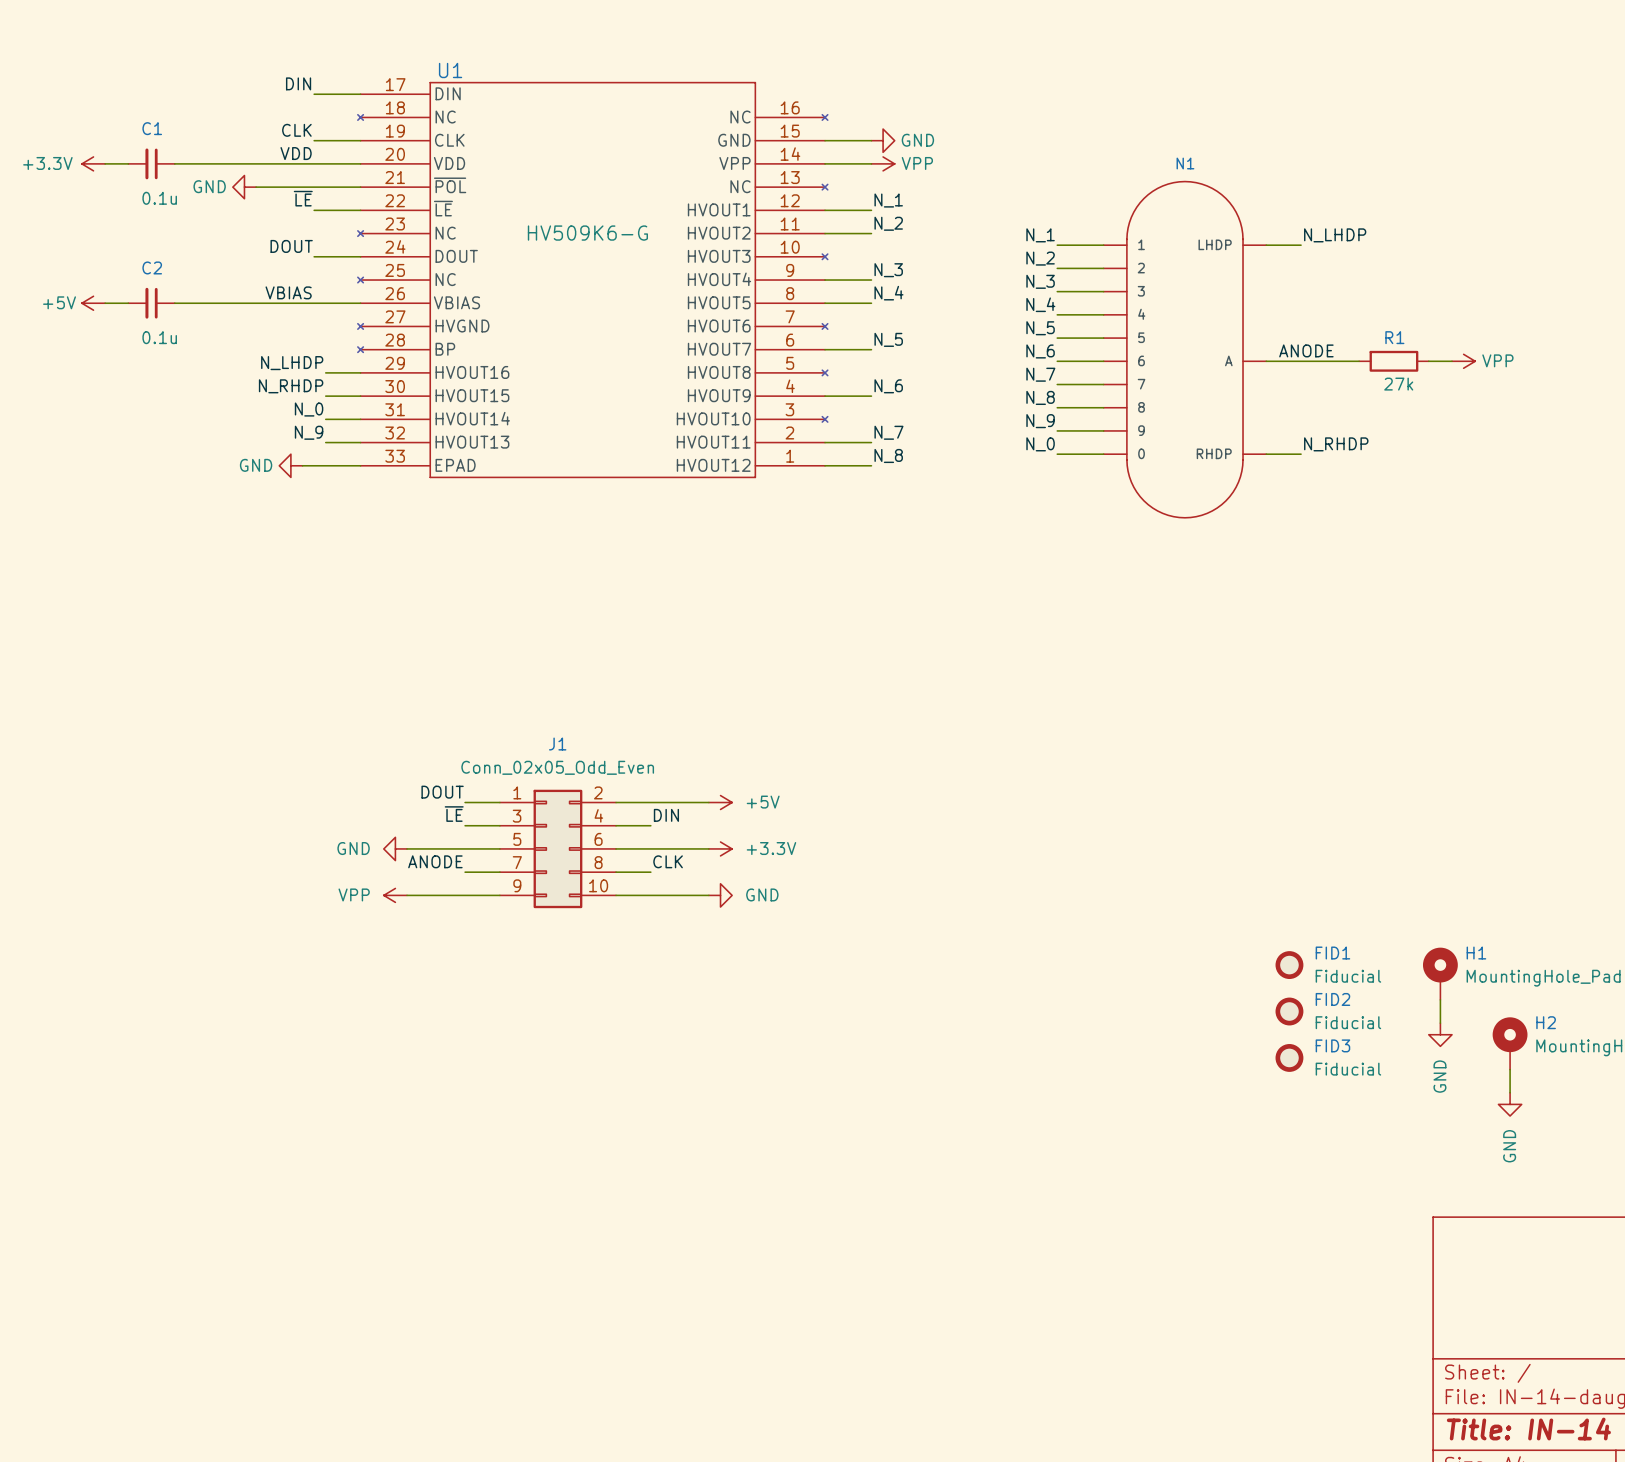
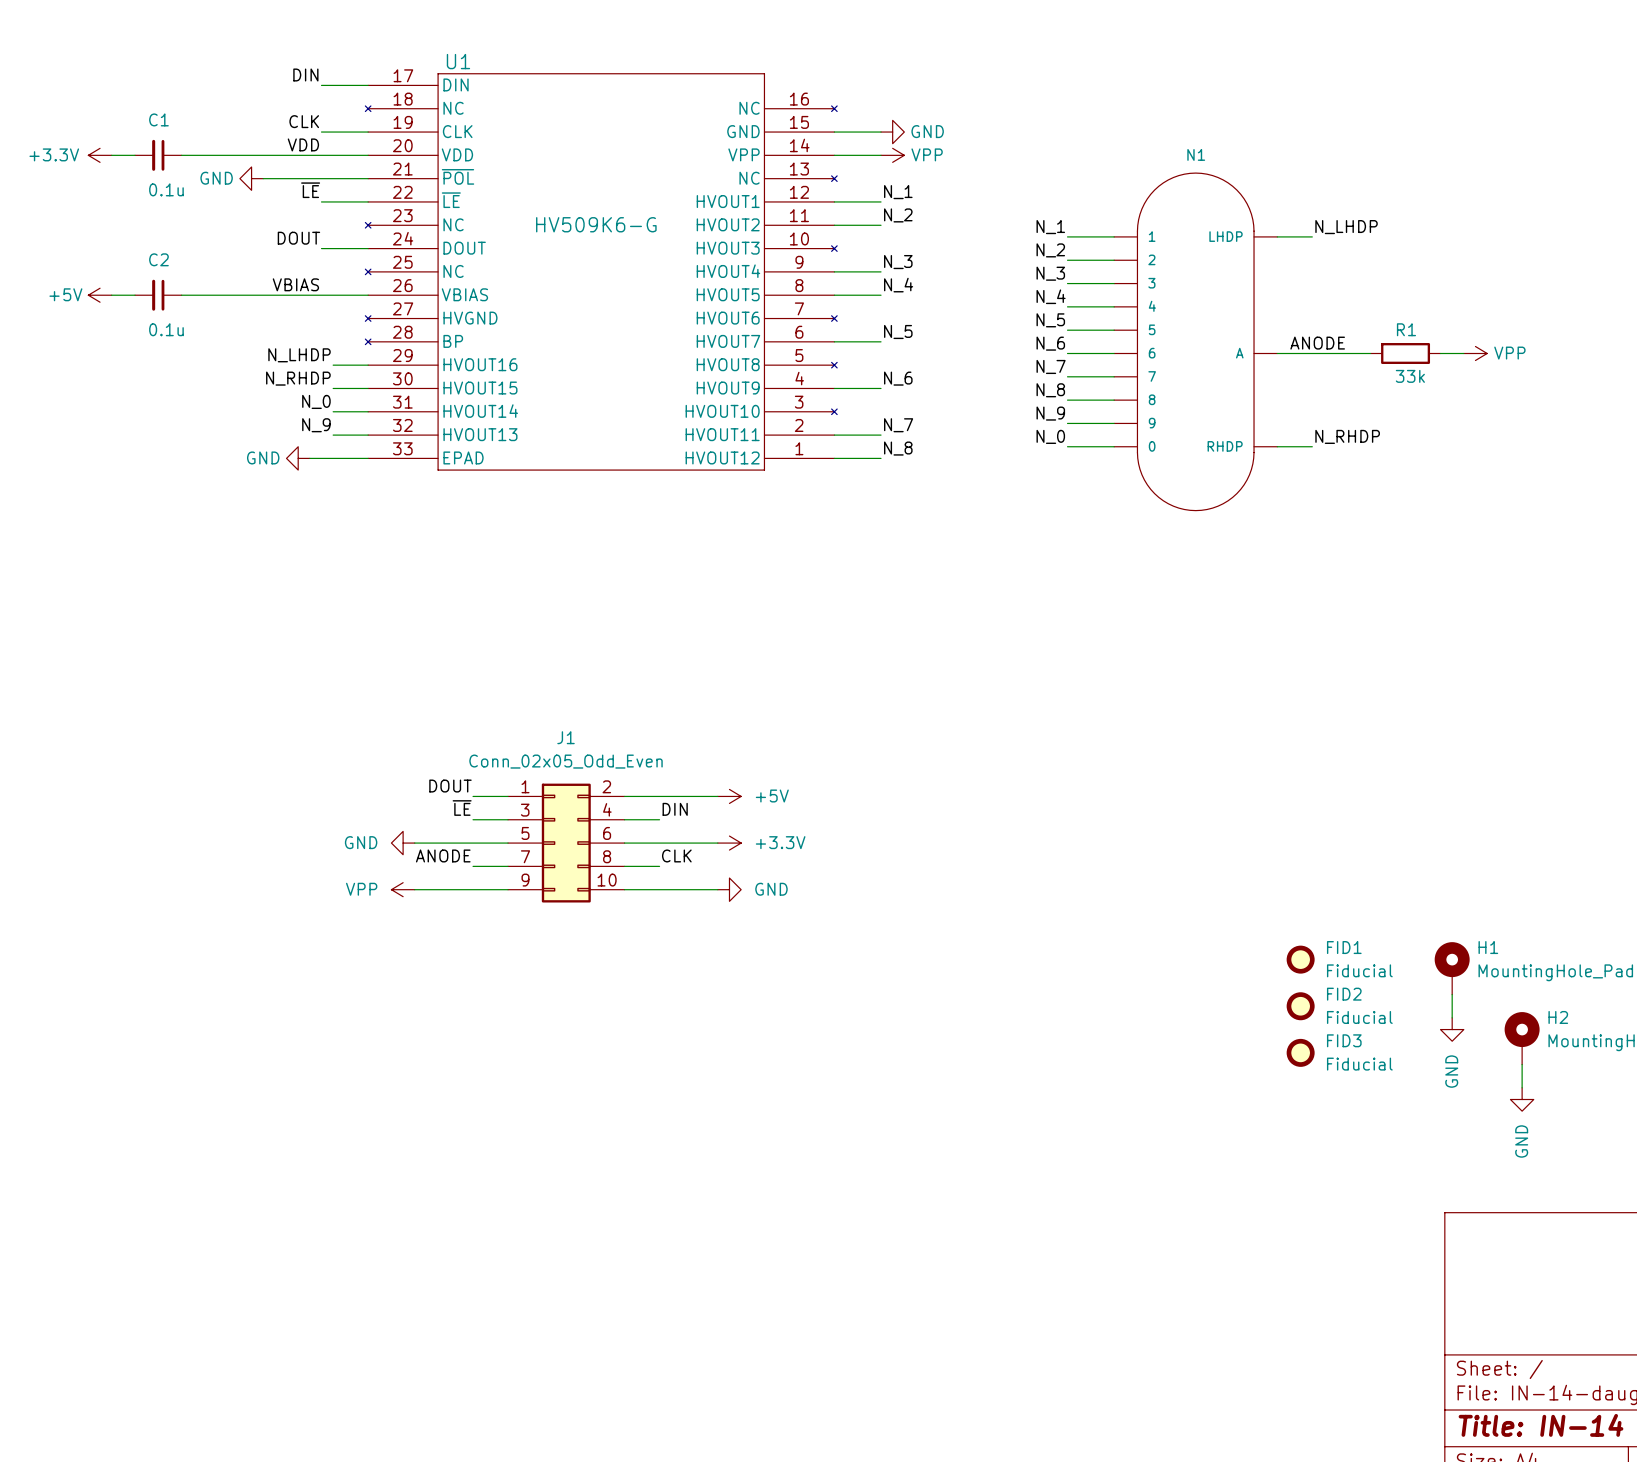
R1 value: 27k (1398, 384) -> 33k (1410, 376)

